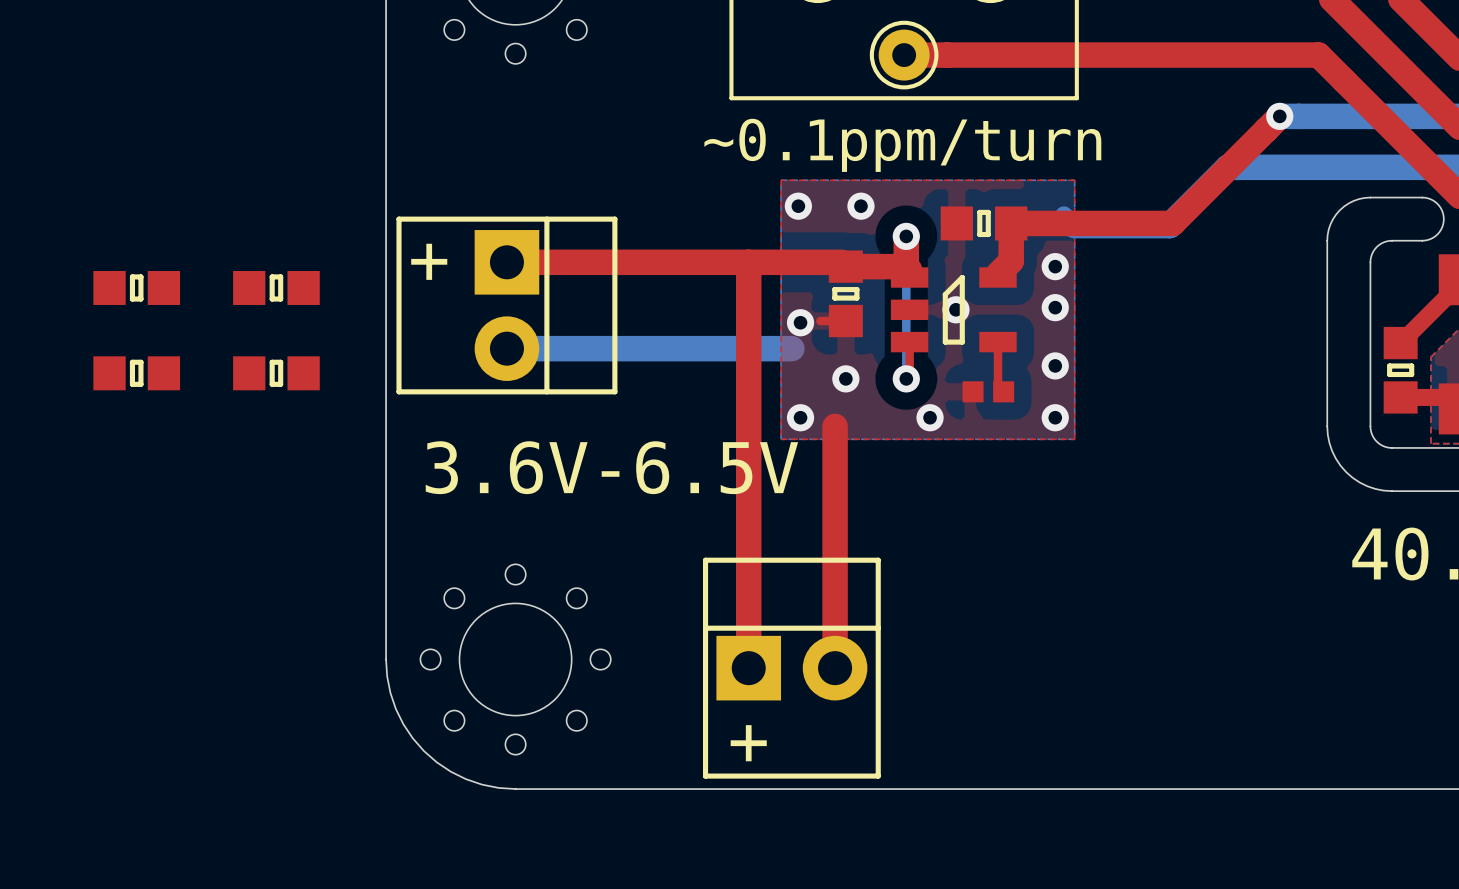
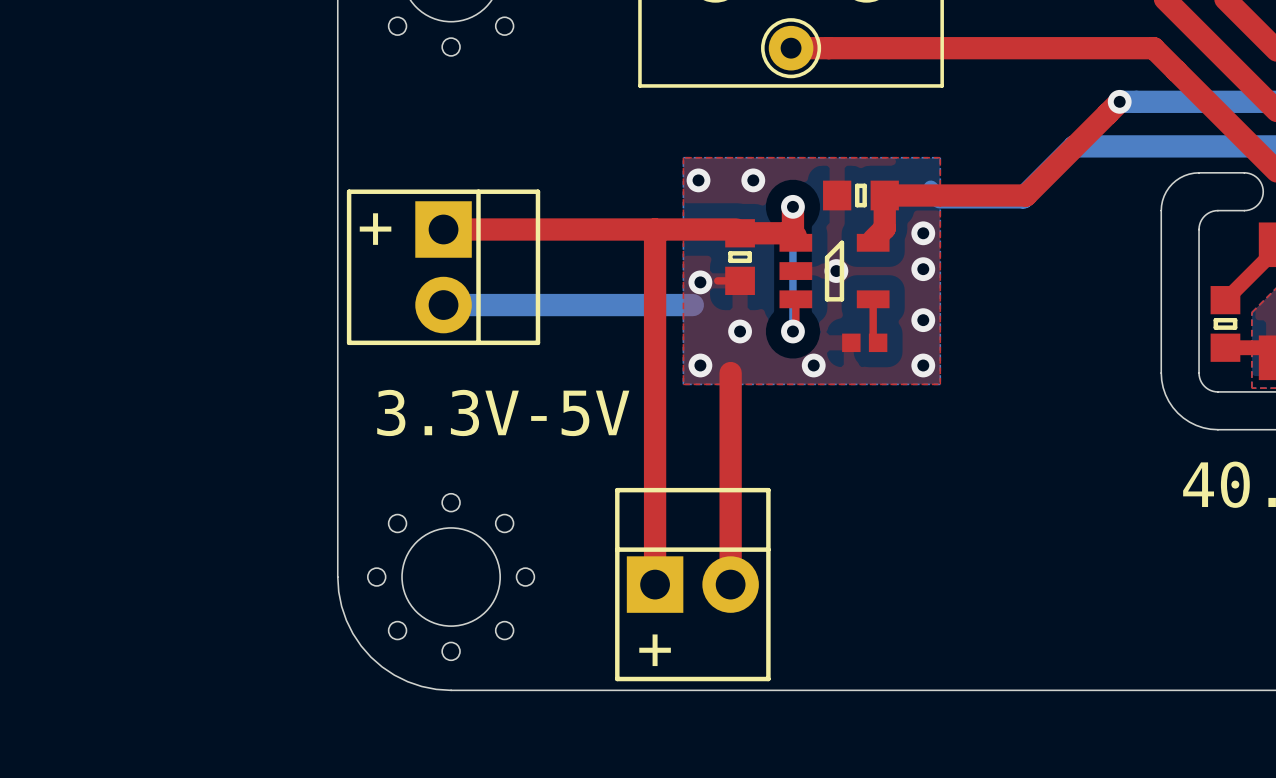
text: ~0.1ppm/turn (902, 145) -> none
part: (136, 287) -> none
part: (276, 287) -> none
part: (136, 373) -> none
part: (276, 373) -> none
text: 3.6V-6.5V (611, 467) -> 3.3V-5V (503, 412)

